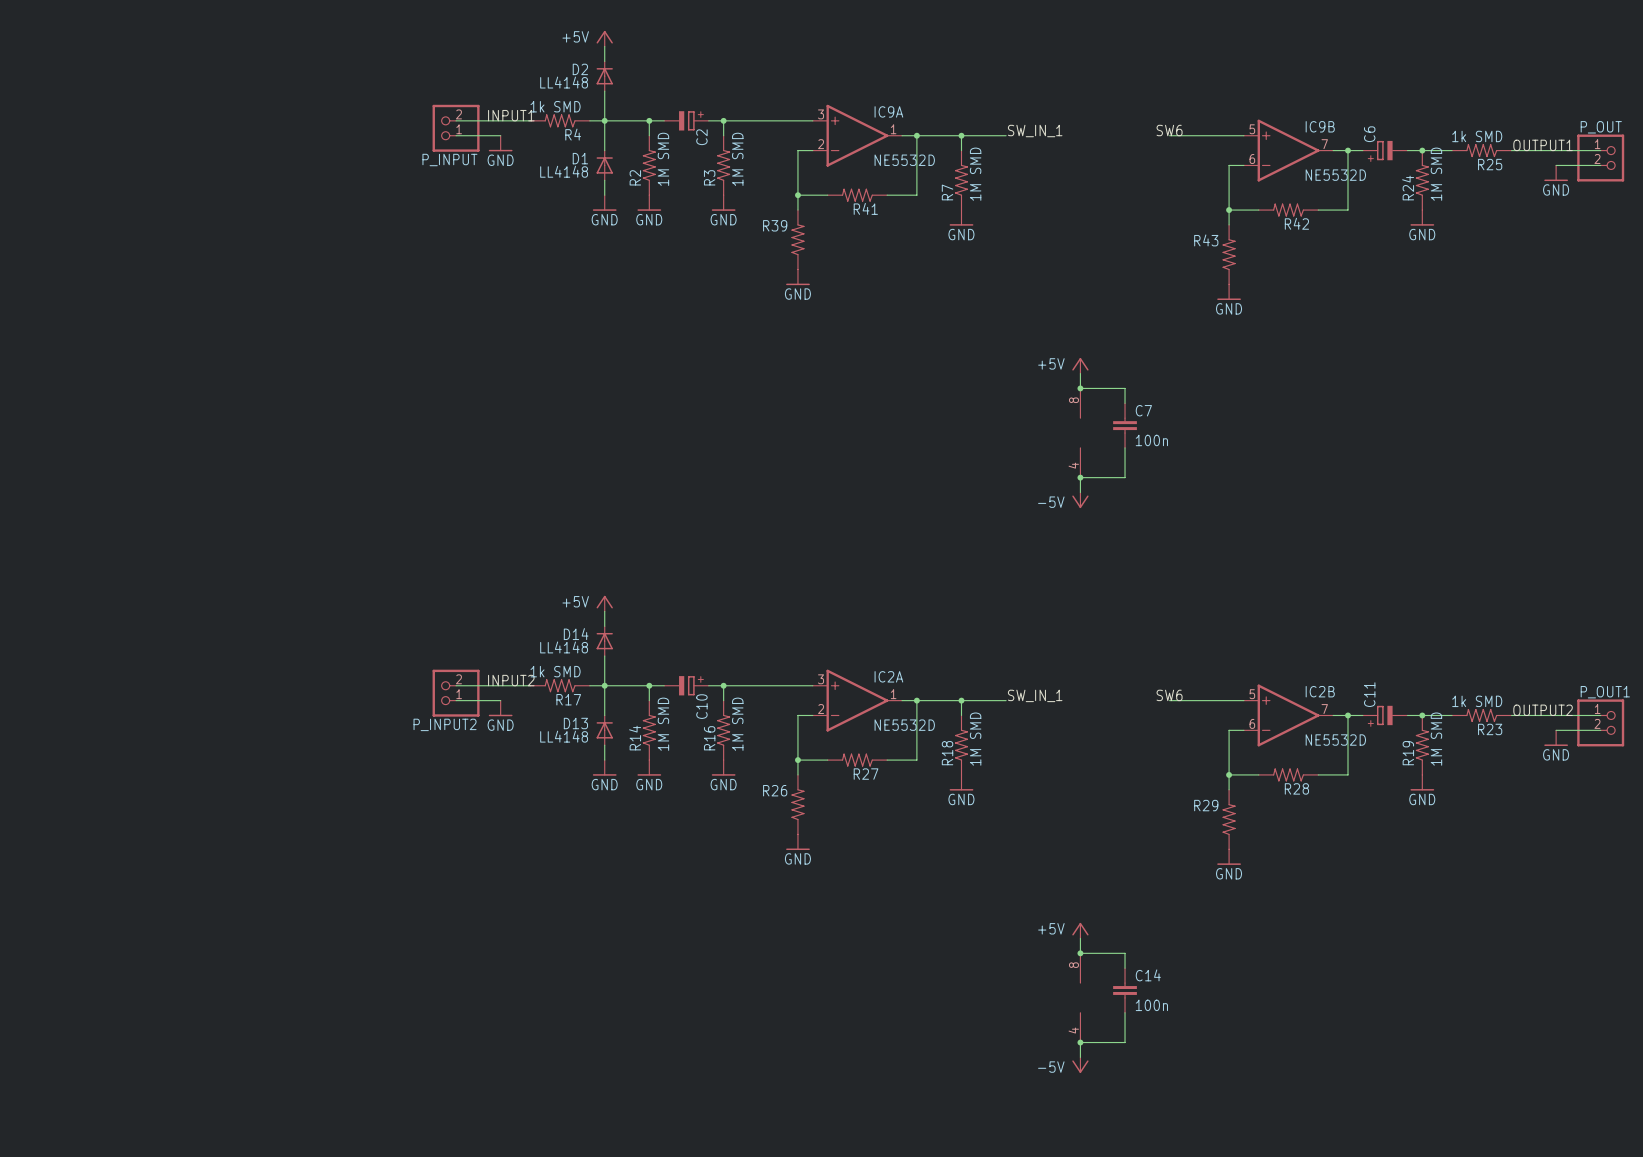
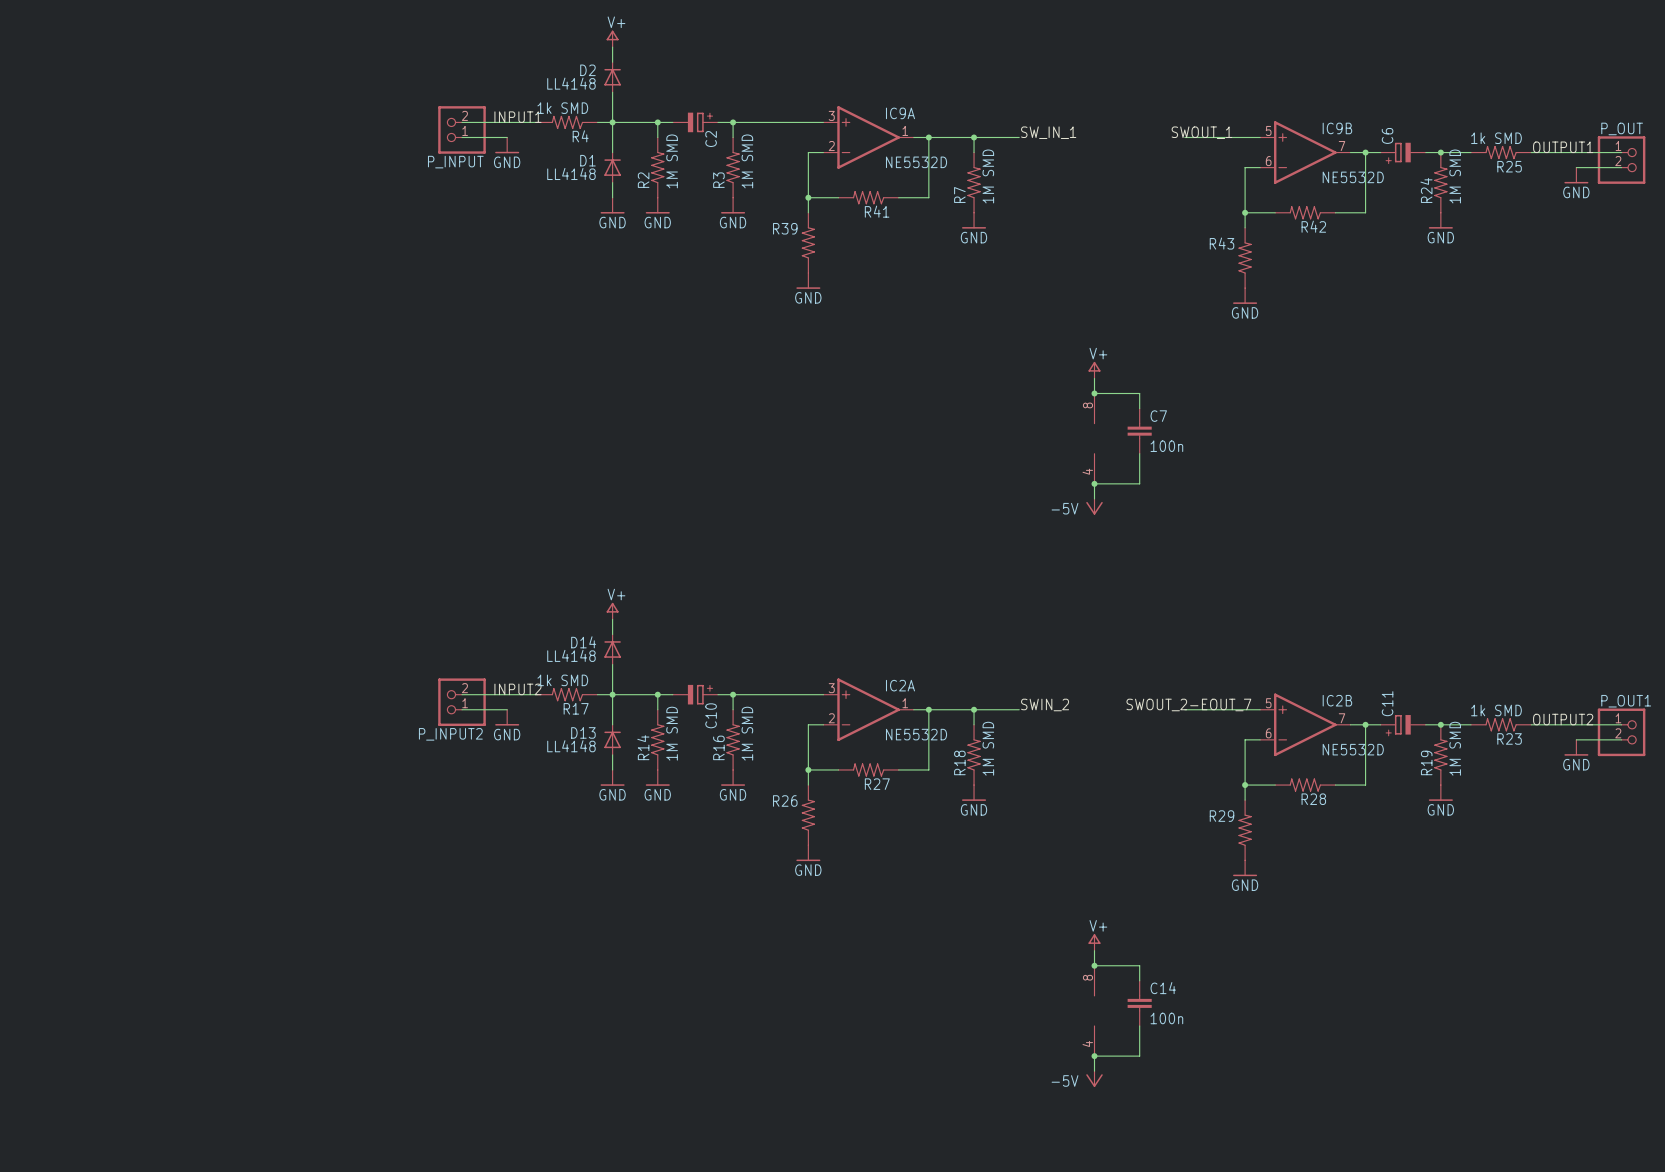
power symbol: +5V (604, 38) -> V+ (612, 38)
label: SW6 (1169, 130) -> SWOUT_1 (1201, 132)
power symbol: +5V (1080, 365) -> V+ (1094, 370)
power symbol: +5V (604, 603) -> V+ (612, 611)
label: SW_IN_1 (1035, 695) -> SWIN_2 (1045, 704)
label: SW6 (1169, 695) -> none
label: none -> SWOUT_2-EOUT_7 (1188, 704)
power symbol: +5V (1080, 930) -> V+ (1094, 942)

